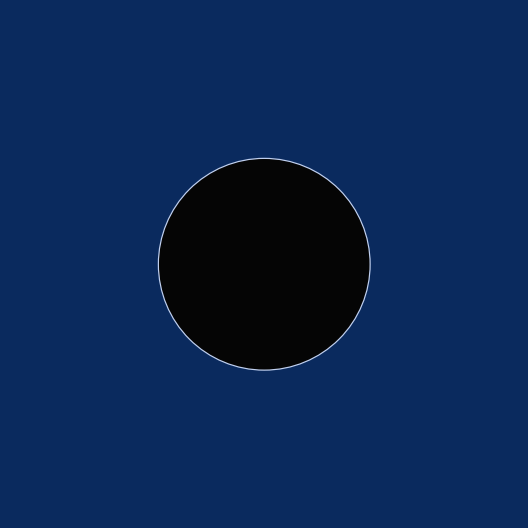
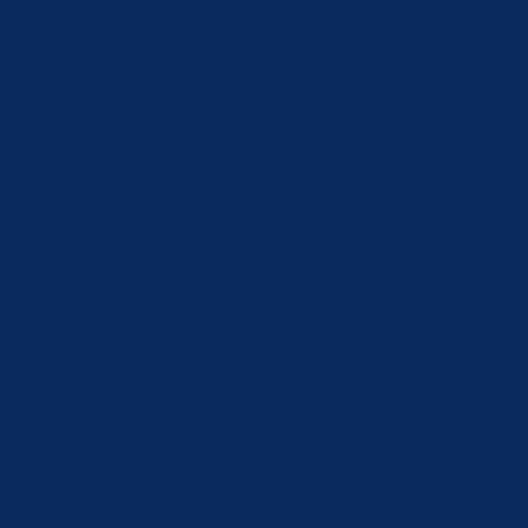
part: (264, 264) -> none

